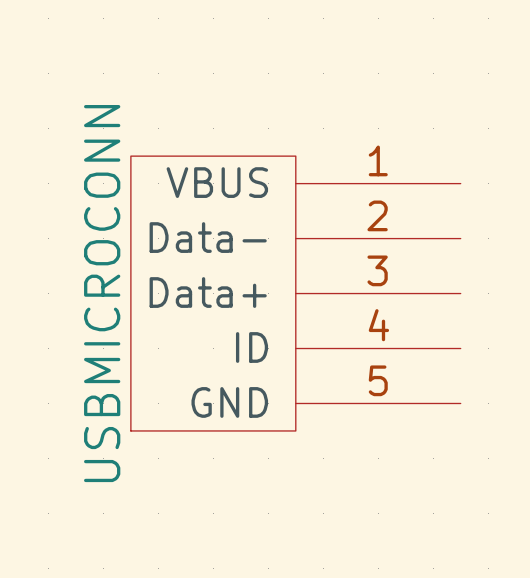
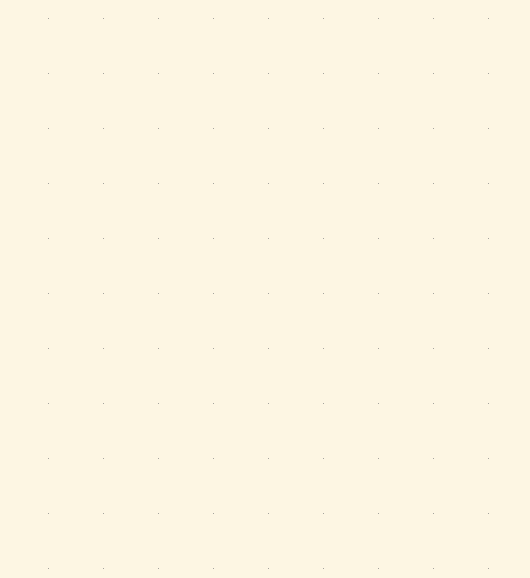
part: USBMICROCONN (295, 293) -> none

